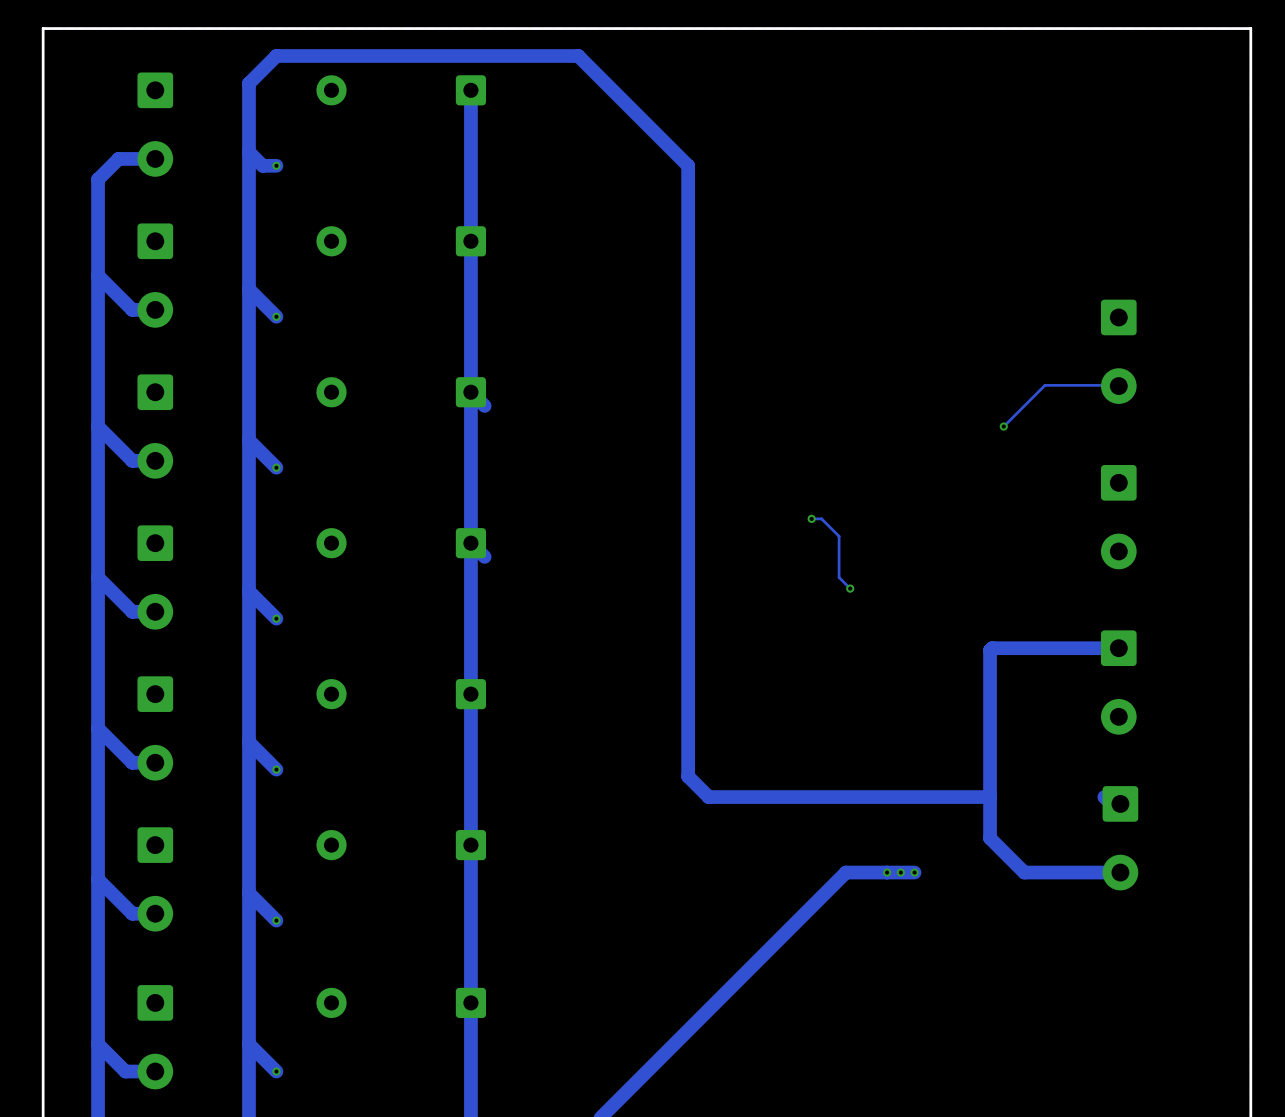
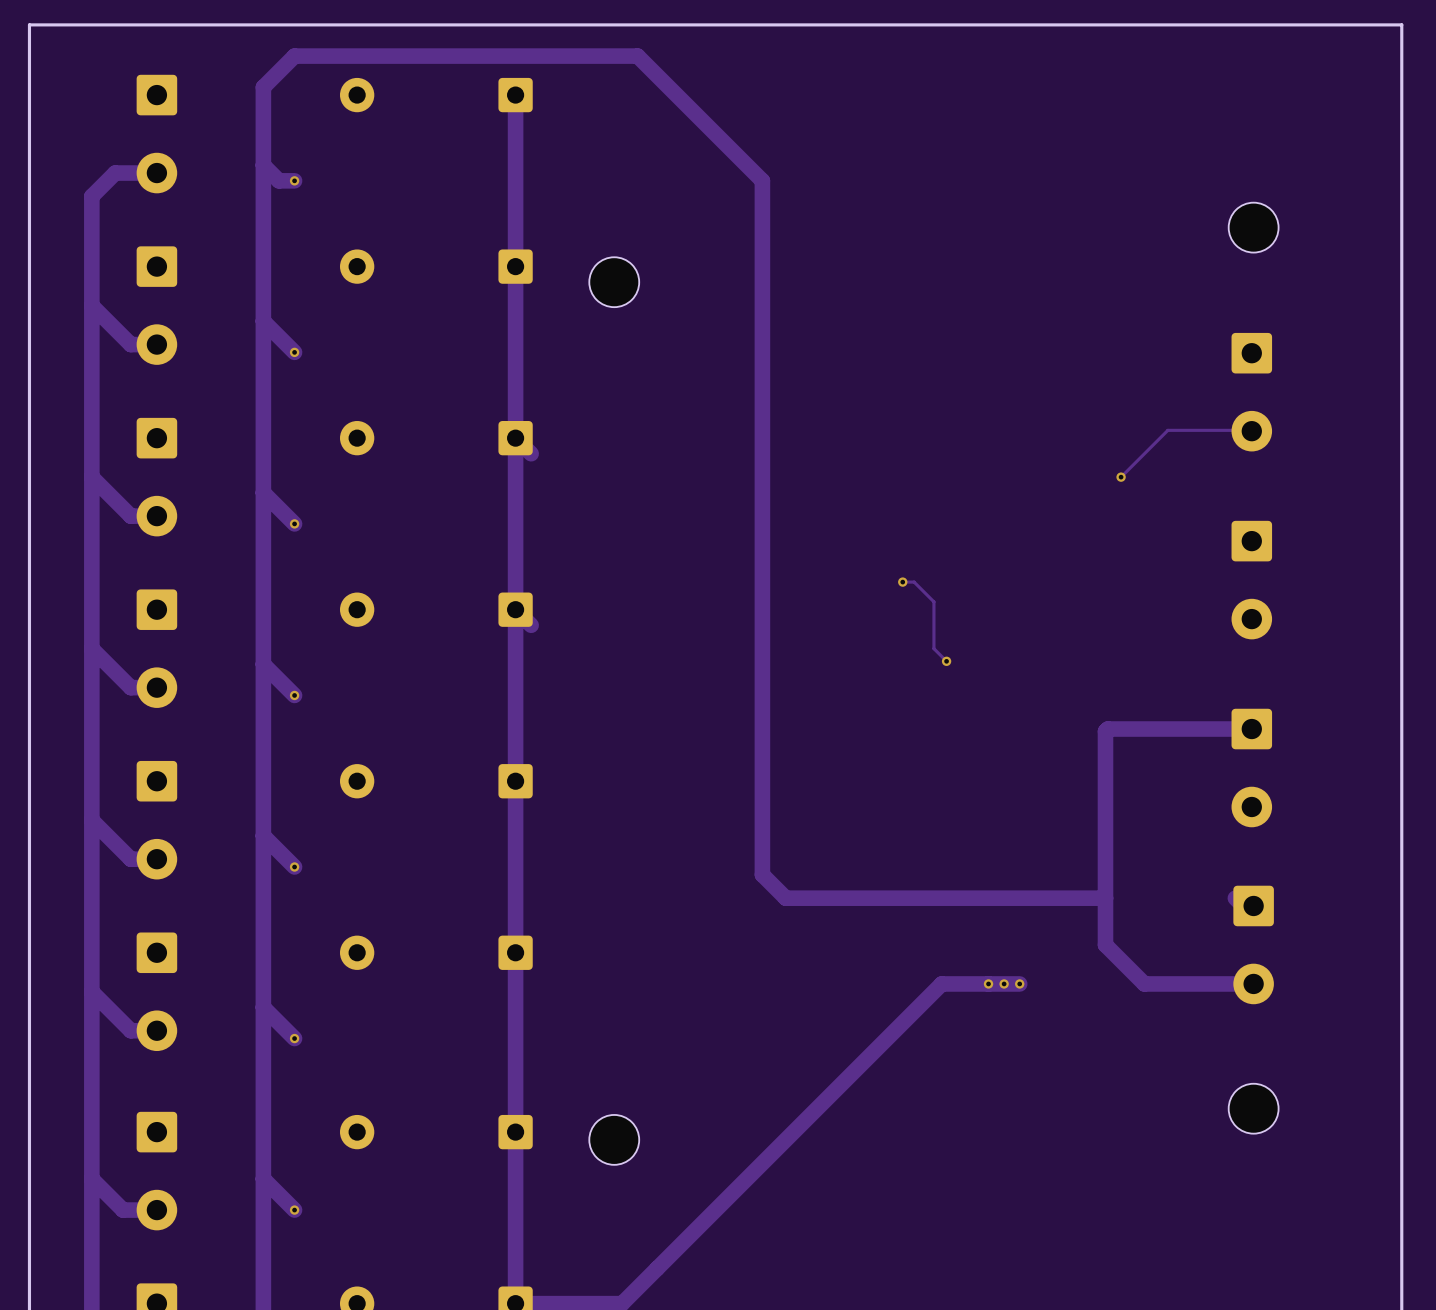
part: none -> (1253, 227)
part: none -> (614, 282)
part: none -> (1253, 1108)
part: none -> (614, 1139)

